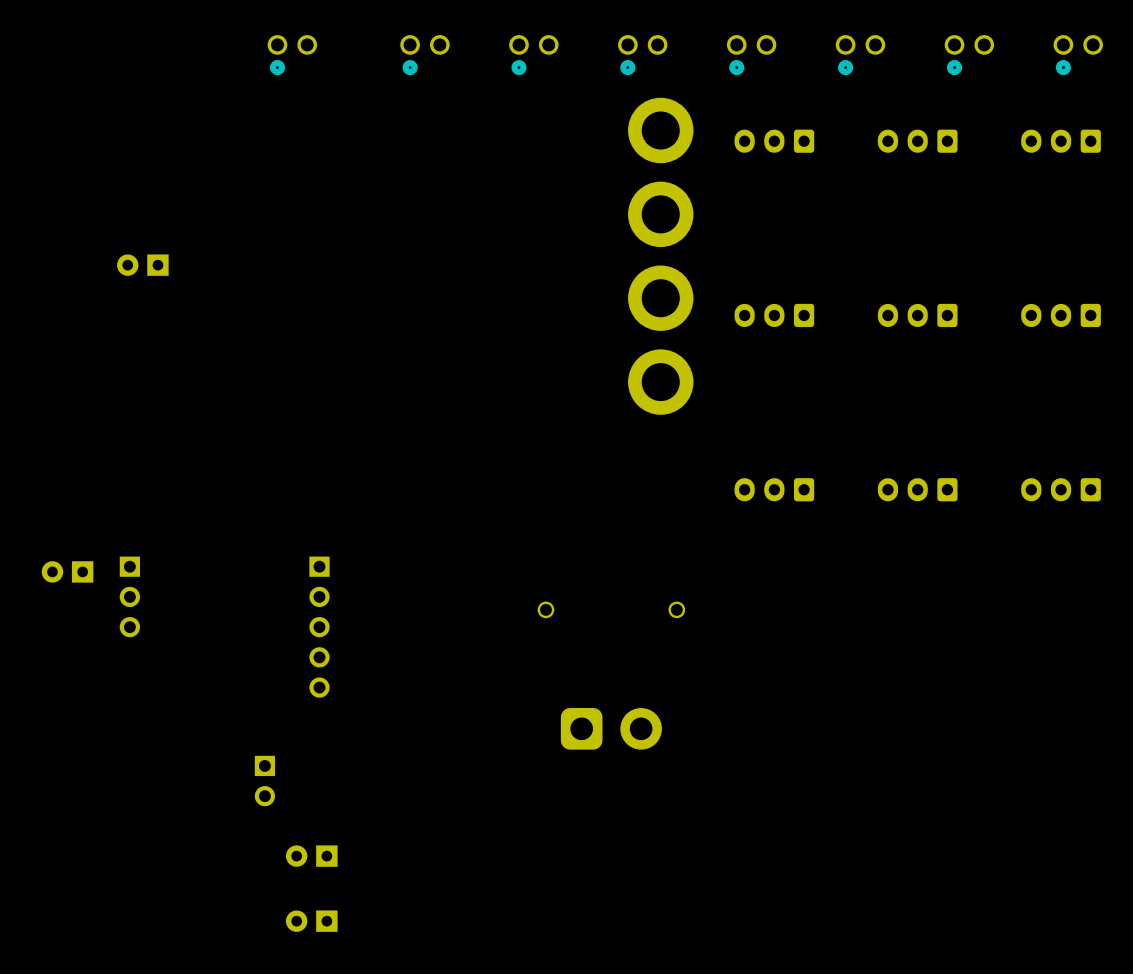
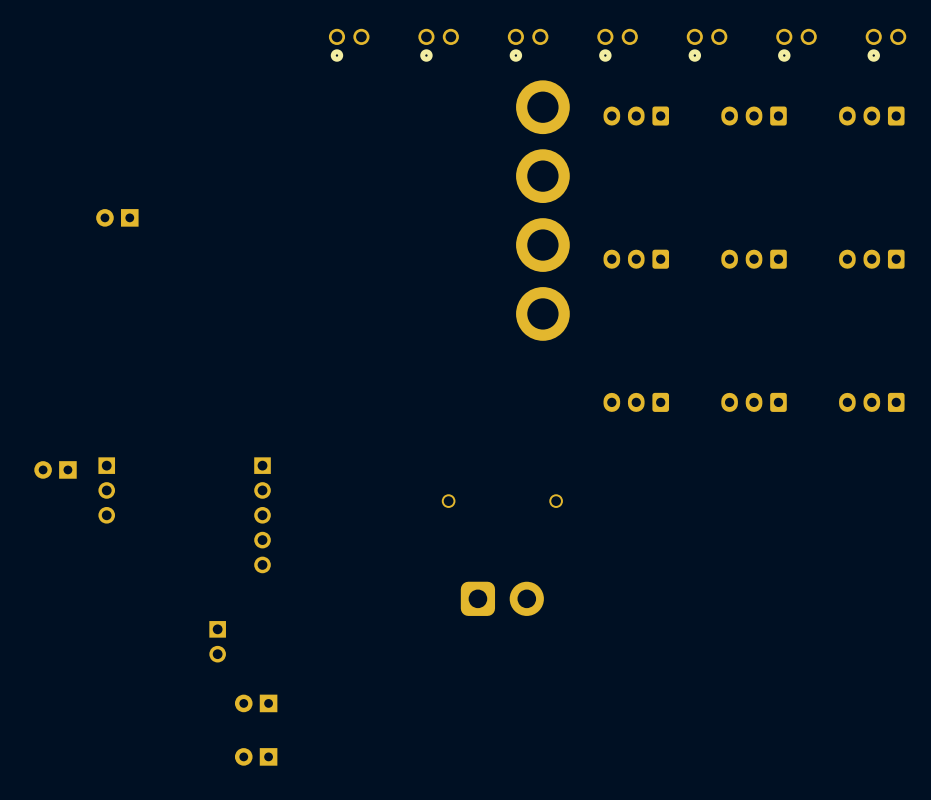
part: (292, 55) -> none

